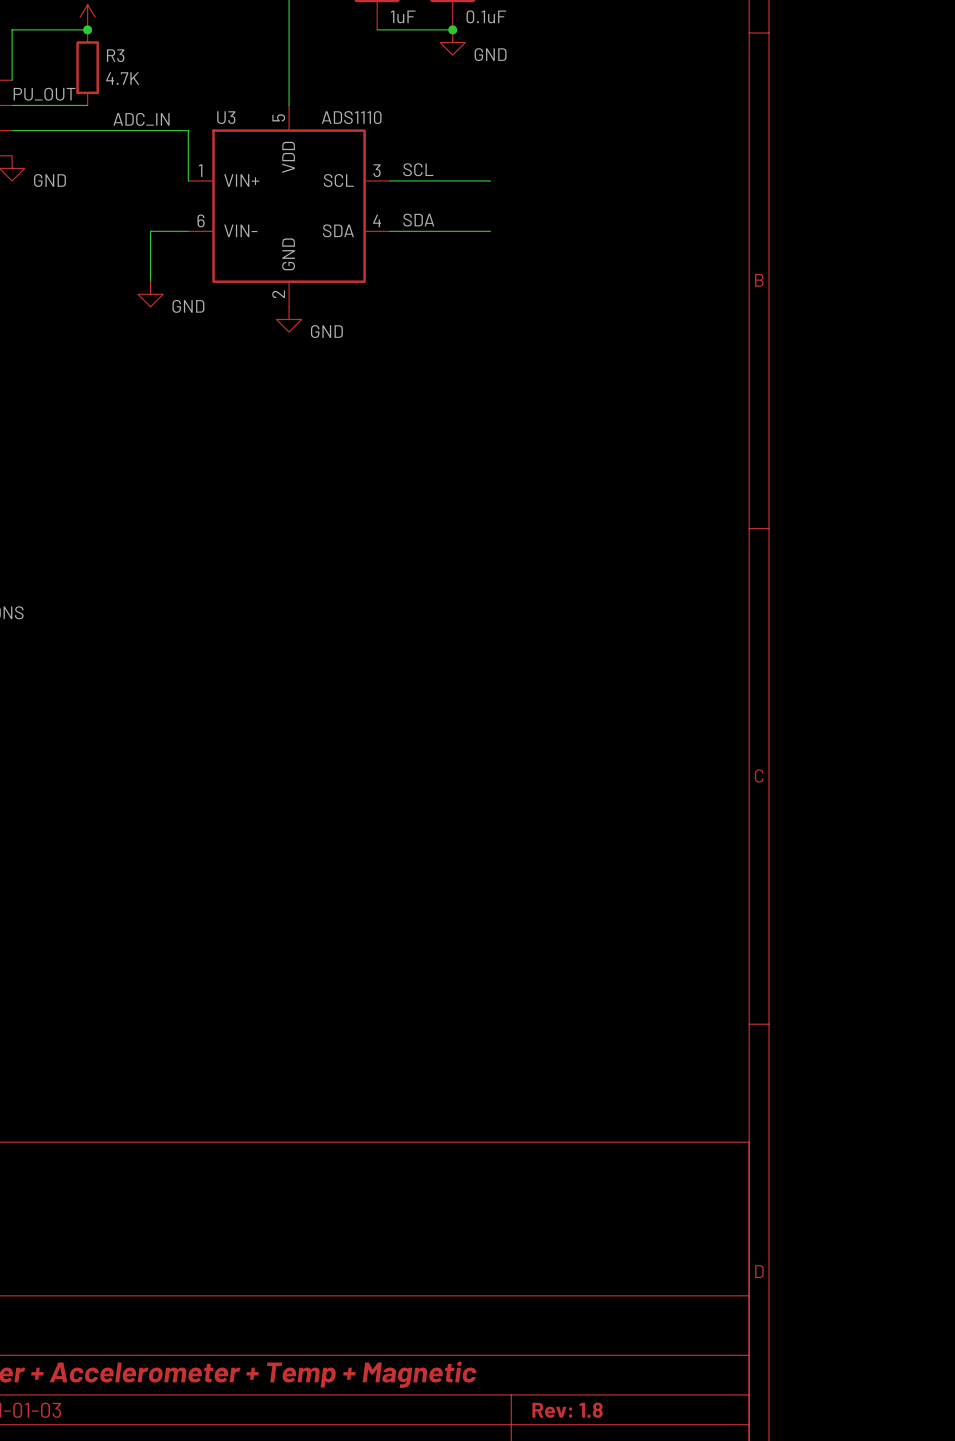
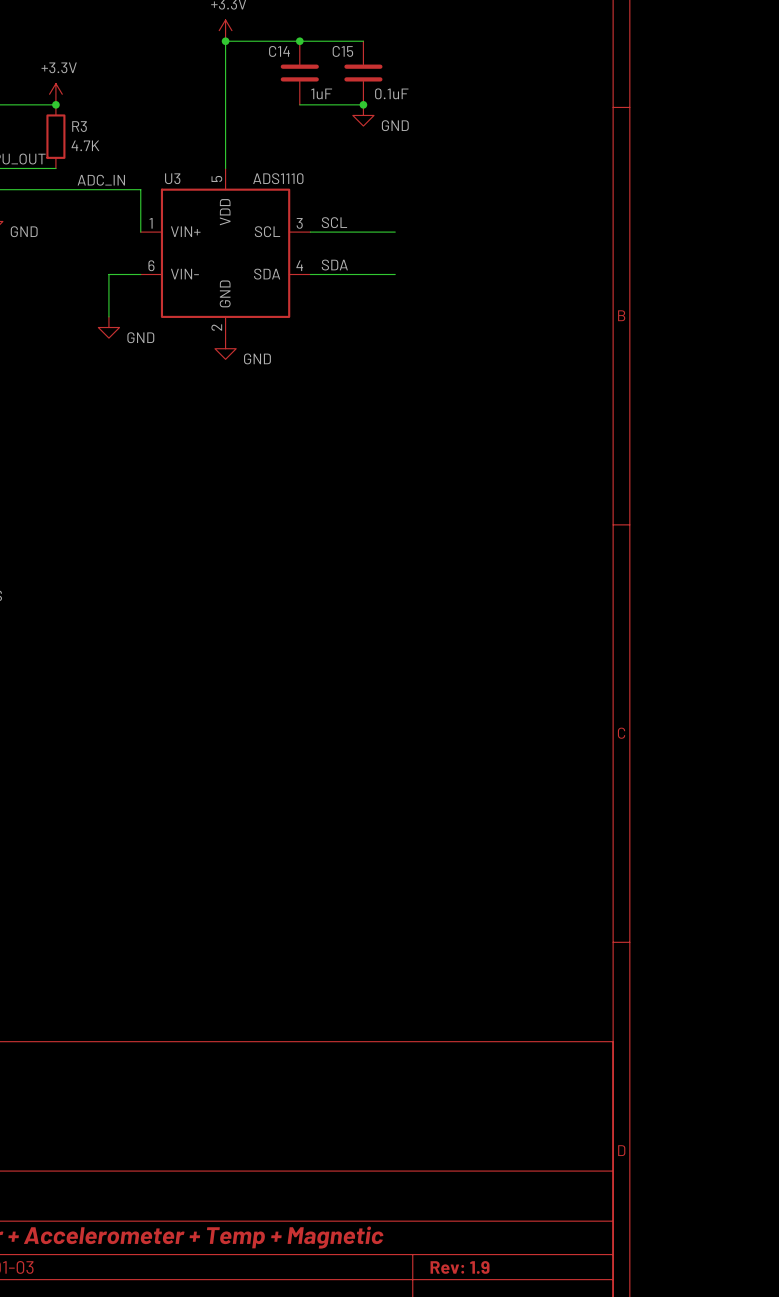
title block: Rev: 1.8 (567, 1410) -> Rev: 1.9 (460, 1267)

